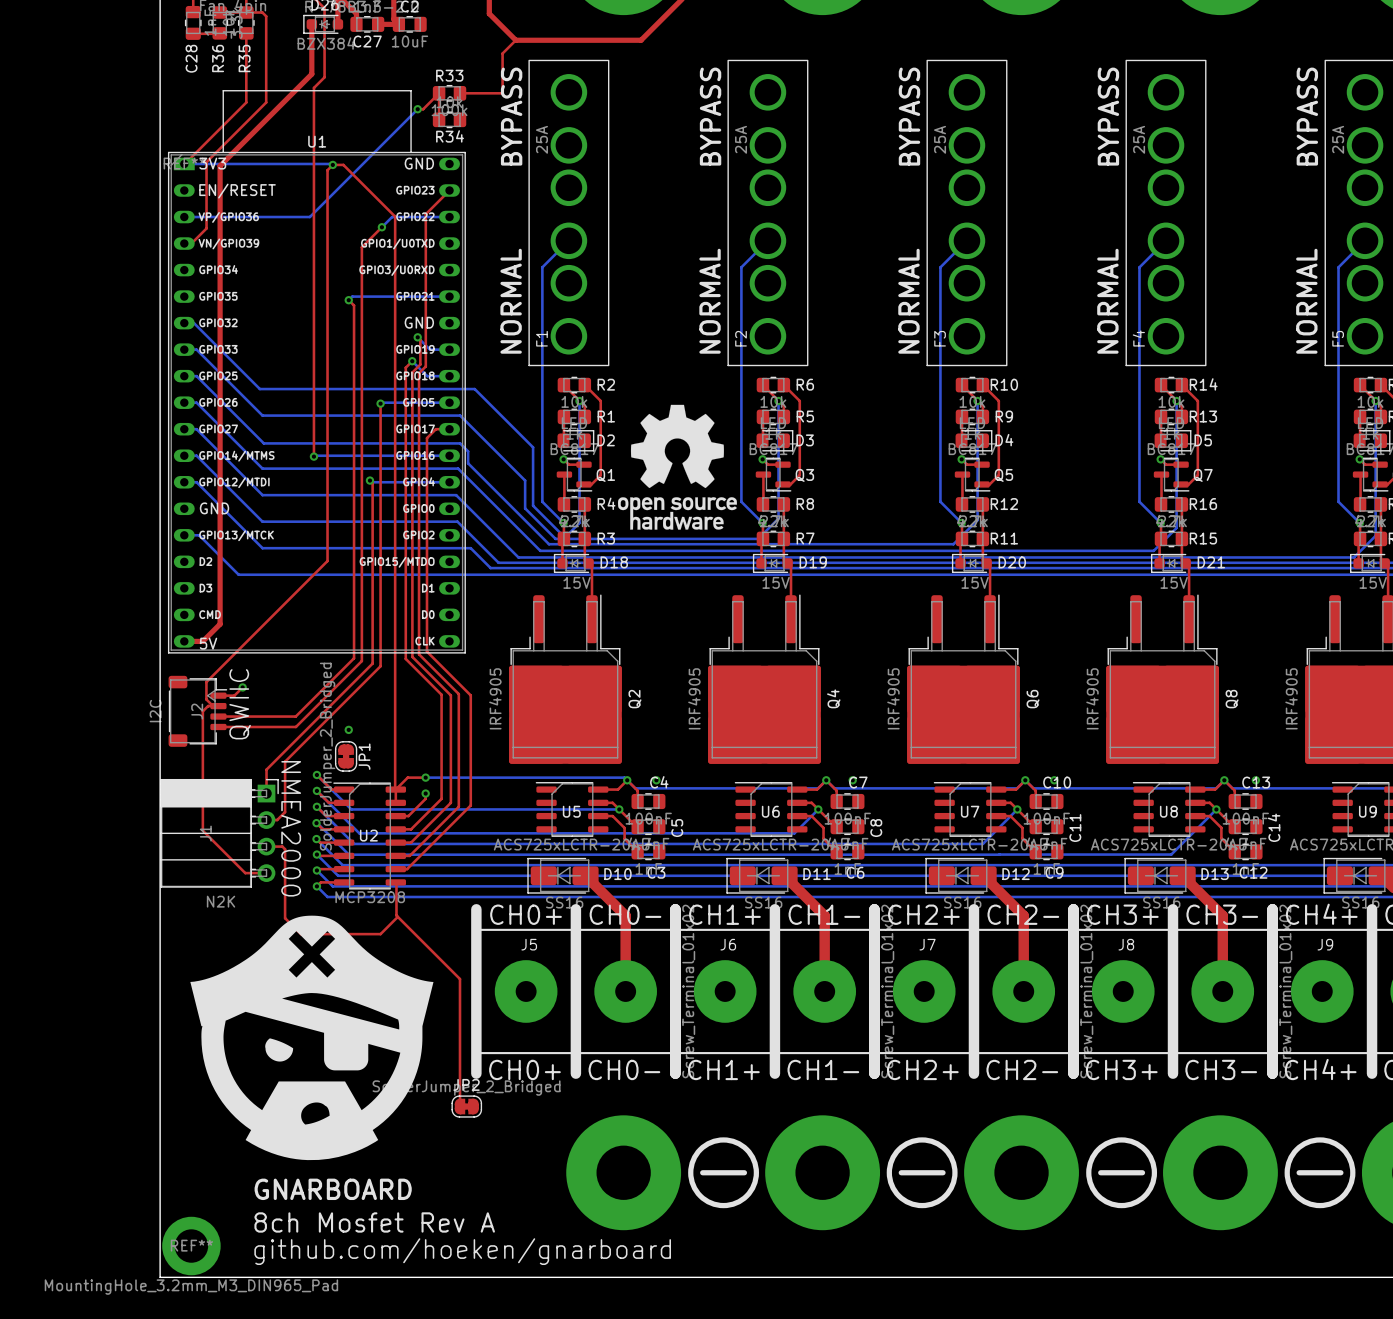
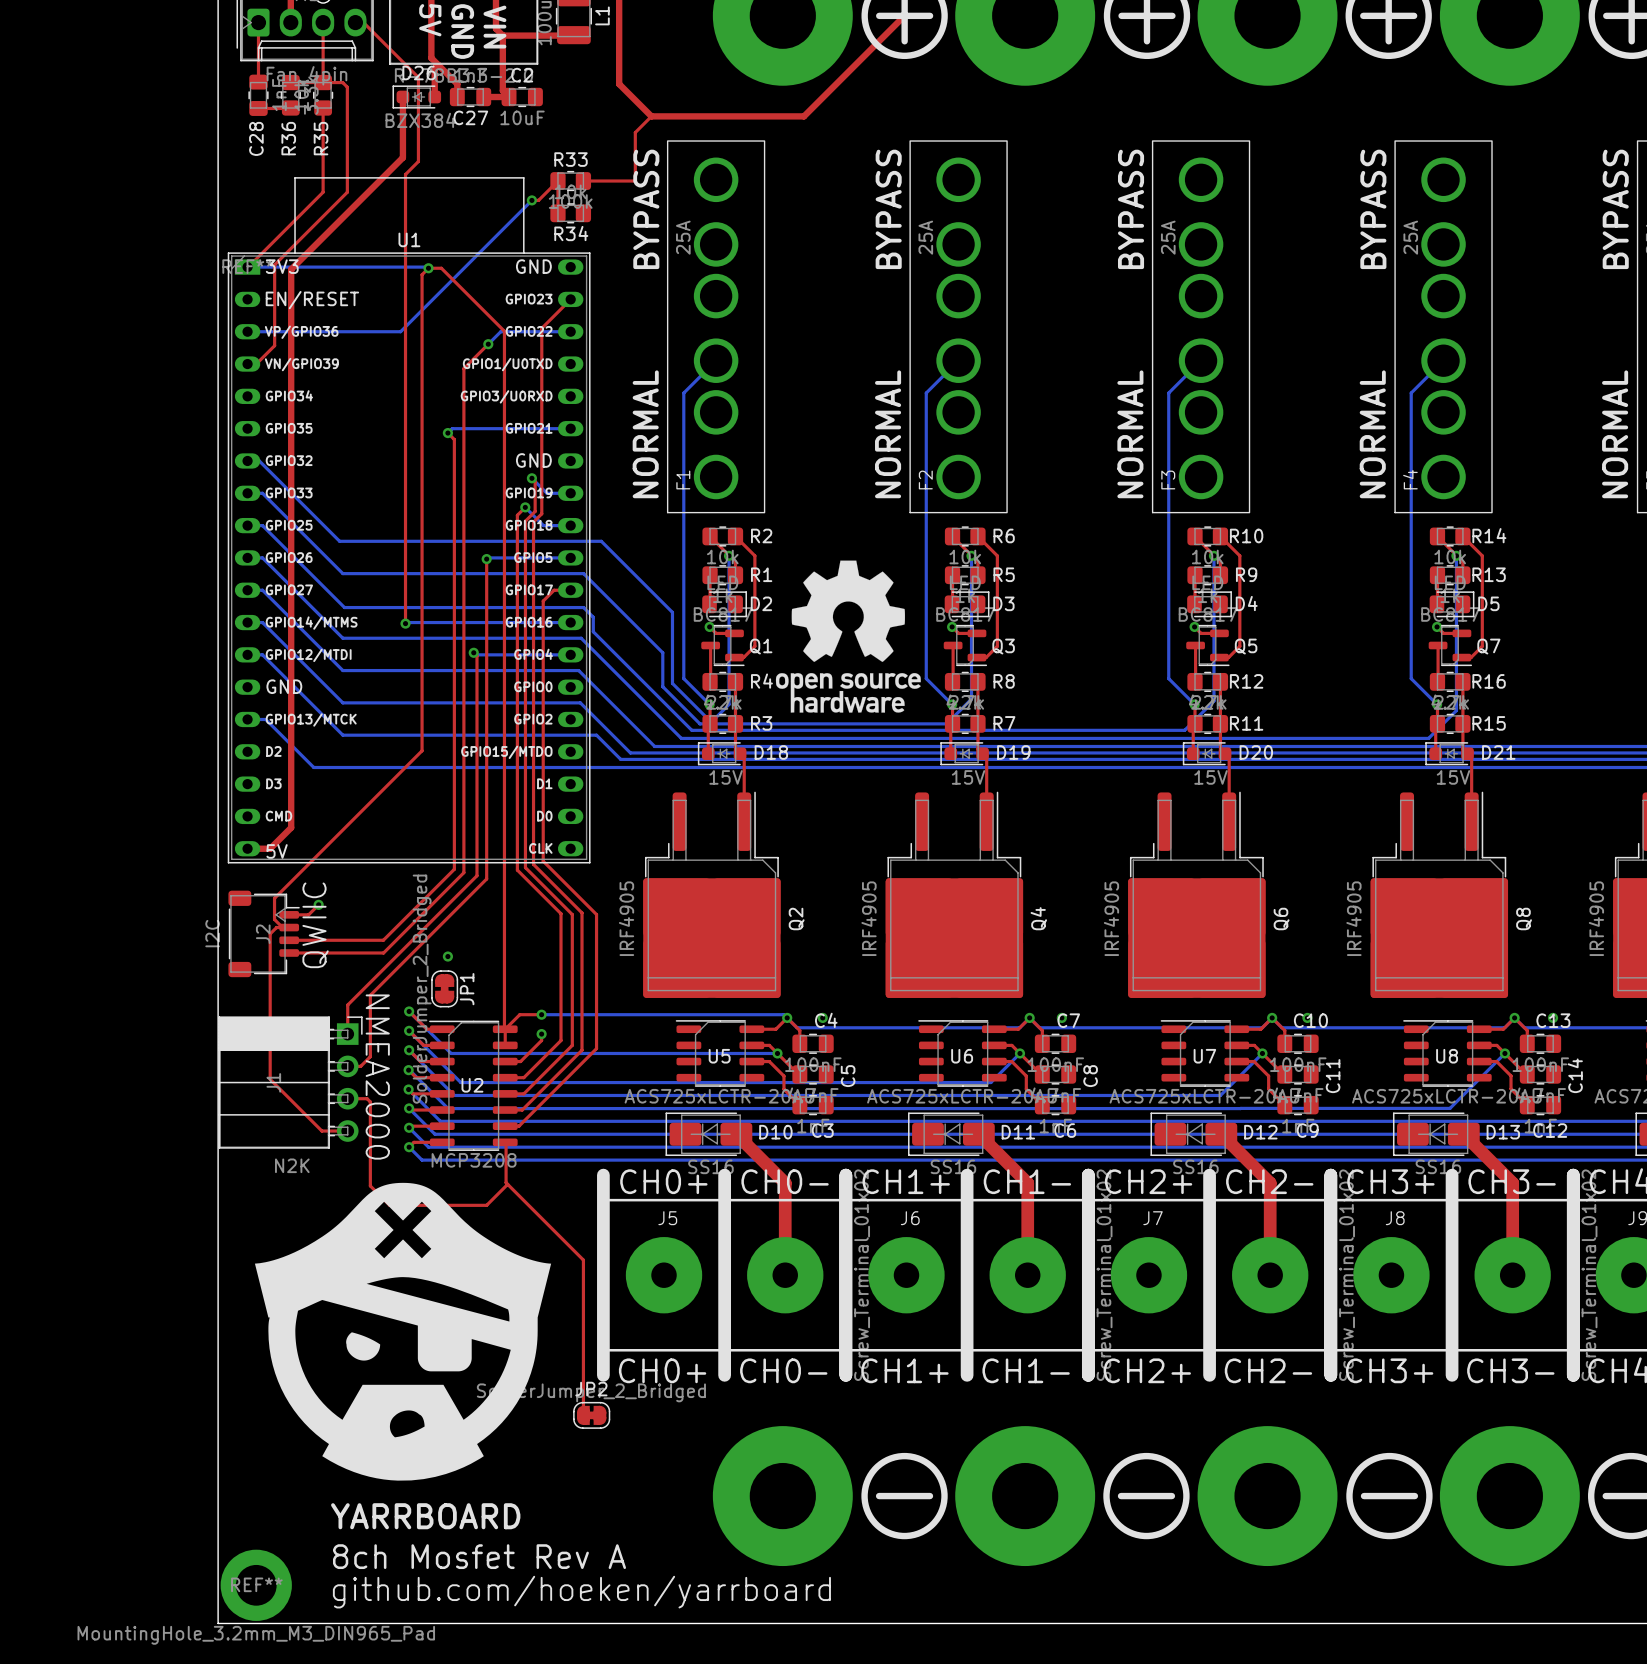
text: GNARBOARD (333, 1189) -> YARRBOARD (425, 1516)
text: github.com/hoeken/gnarboard (462, 1251) -> github.com/hoeken/yarrboard (581, 1592)

